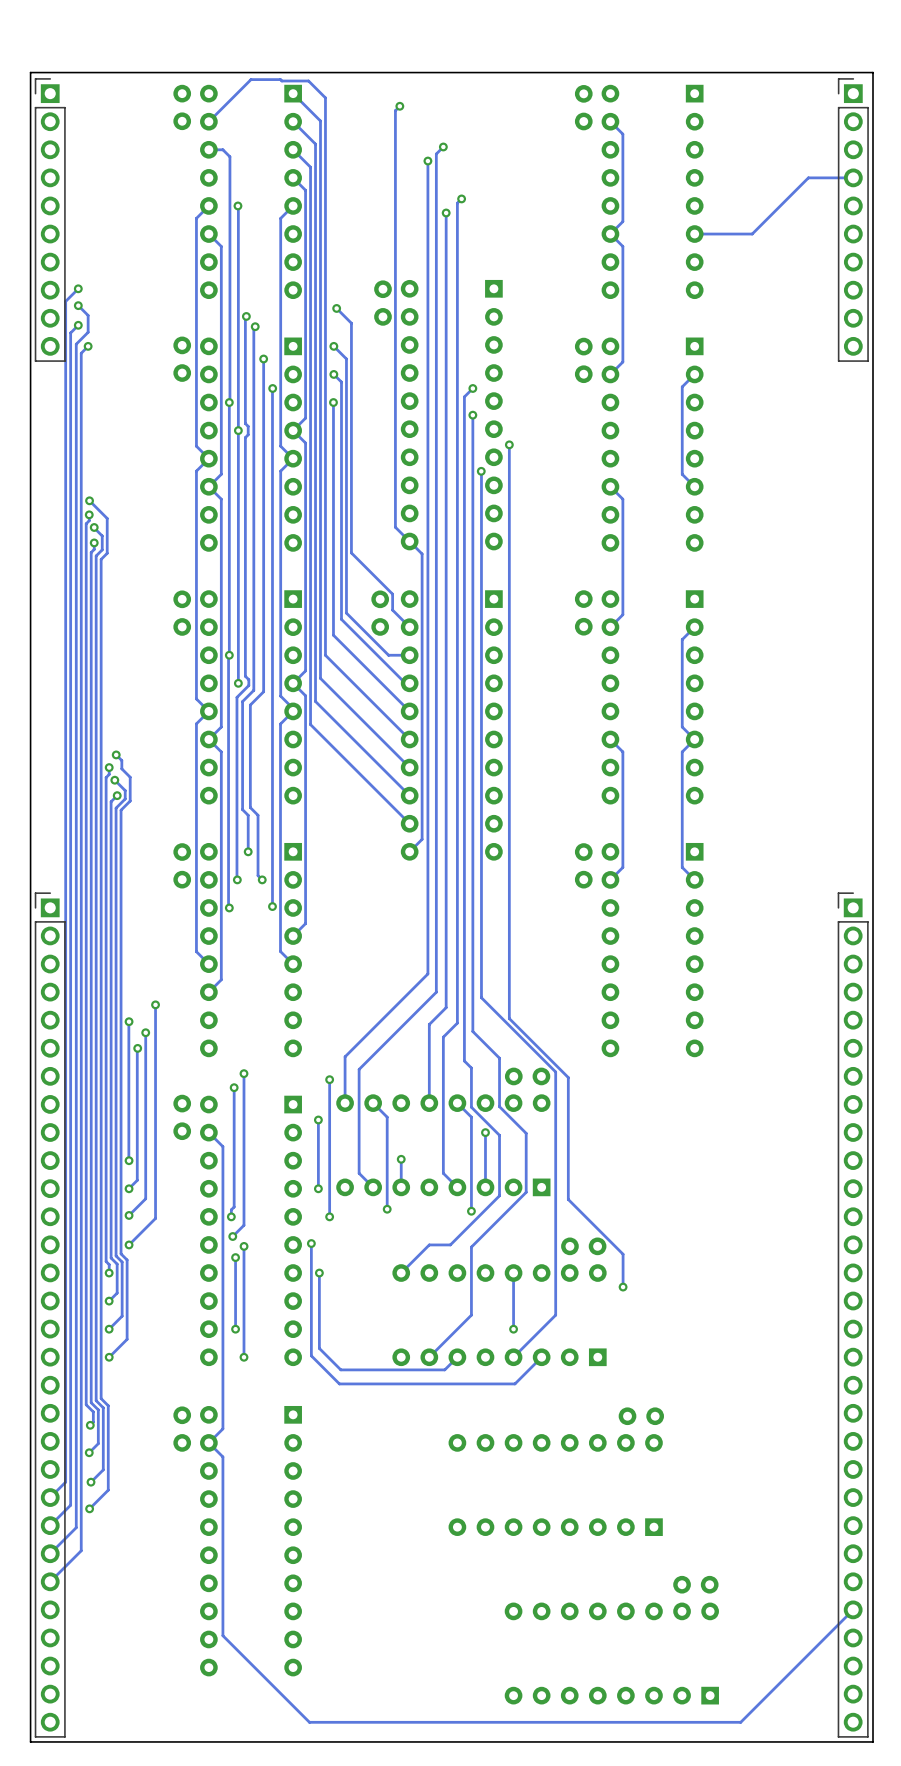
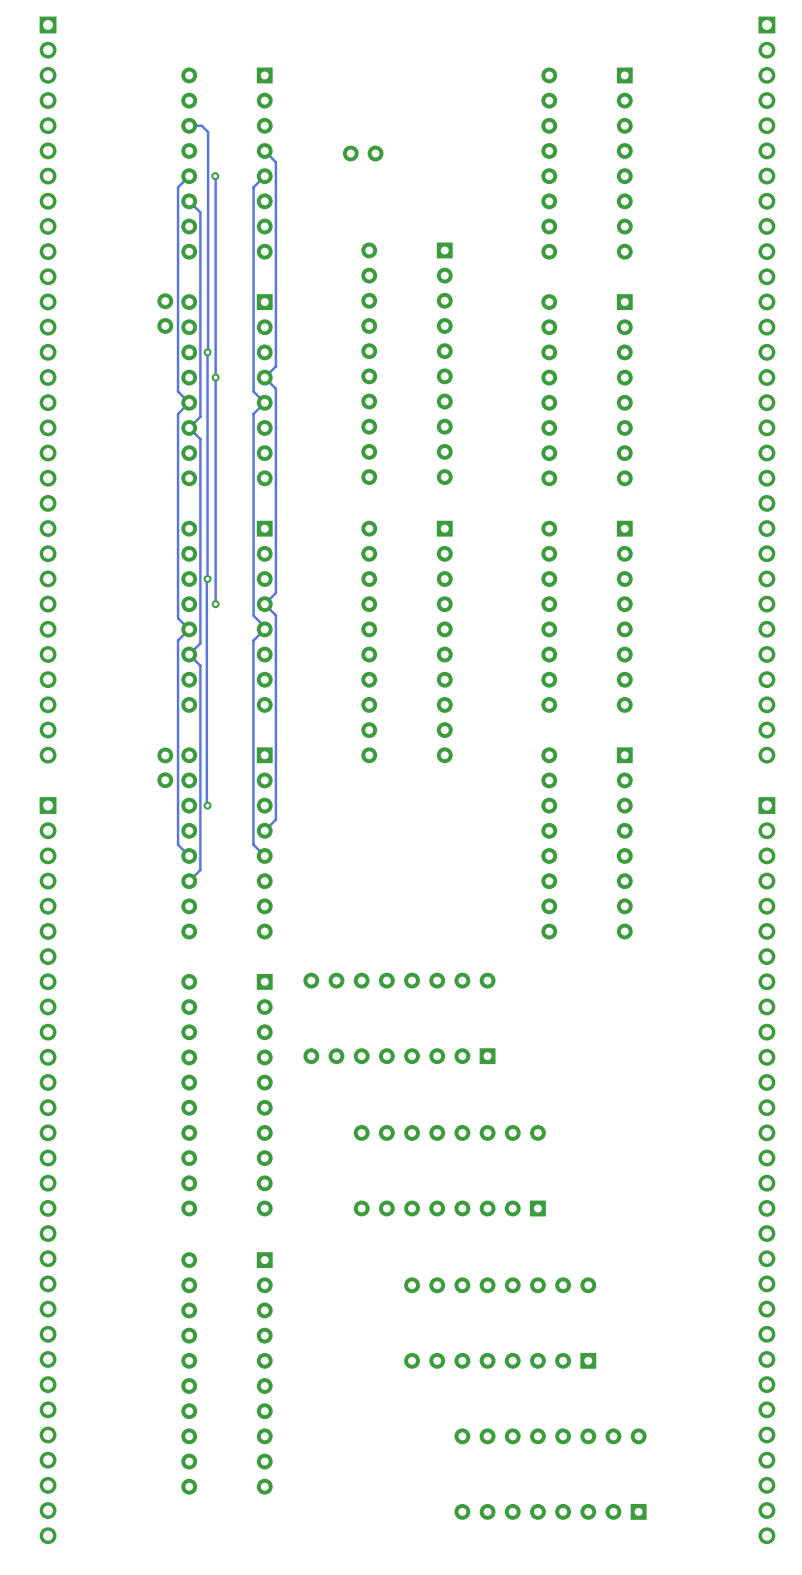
board edge: (873, 72) (30, 72) (30, 1741) (873, 1741) (873, 72) -> none
track: (293, 93) (320, 120) (320, 678) (409, 767) -> none
track: (399, 106) (395, 110) (395, 527) (422, 553) (422, 839) (409, 851) -> none
via: (399, 106) -> none
part: (182, 107) -> none
part: (583, 107) -> none
track: (208, 121) (251, 79) (308, 80) (325, 97) (325, 655) (409, 739) -> none
track: (293, 121) (315, 144) (315, 701) (409, 795) -> none
track: (610, 121) (622, 134) (622, 221) (610, 234) (622, 246) (622, 362) (610, 374) -> none
track: (443, 146) (436, 154) (436, 992) (359, 1069) (359, 1173) (373, 1187) -> none
via: (443, 146) -> none
track: (293, 149) (310, 167) (310, 724) (409, 823) -> none
track: (427, 161) (427, 973) (345, 1056) (345, 1103) -> none
via: (427, 161) -> none
track: (853, 177) (808, 177) (752, 234) (694, 234) -> none
part: none -> (363, 153)
track: (461, 198) (457, 203) (457, 1023) (443, 1037) (443, 1173) (457, 1187) -> none
via: (461, 198) -> none
track: (446, 212) (446, 1007) (429, 1024) (429, 1103) -> none
via: (446, 212) -> none
part: (50, 219) -> none
part: (853, 219) -> none
track: (78, 288) (65, 301) (65, 1482) (50, 1497) -> none
via: (78, 288) -> none
part: (382, 303) -> none
track: (78, 305) (88, 315) (88, 332) (76, 344) (76, 1527) (50, 1553) -> none
via: (78, 305) -> none
track: (336, 308) (351, 323) (351, 552) (392, 594) (392, 610) (409, 627) -> none
via: (336, 308) -> none
track: (246, 316) (245, 423) (248, 426) (248, 434) (245, 437) (245, 676) (248, 679) (248, 685) (236, 697) (237, 879) -> none
via: (246, 316) -> none
track: (78, 325) (70, 332) (70, 1505) (50, 1525) -> none
via: (78, 325) -> none
track: (255, 326) (253, 690) (242, 701) (242, 809) (248, 815) (248, 851) -> none
via: (255, 326) -> none
track: (88, 346) (81, 353) (81, 1550) (50, 1581) -> none
via: (88, 346) -> none
track: (333, 346) (346, 358) (346, 613) (388, 655) (409, 655) -> none
via: (333, 346) -> none
track: (263, 358) (263, 691) (250, 705) (250, 807) (258, 815) (258, 875) (262, 879) -> none
via: (263, 358) -> none
part: (583, 360) -> none
track: (333, 374) (341, 382) (341, 619) (405, 683) (409, 683) -> none
via: (333, 374) -> none
track: (694, 374) (682, 386) (682, 474) (694, 486) -> none
track: (272, 388) (272, 906) -> none
via: (272, 388) -> none
track: (472, 388) (464, 396) (464, 1061) (471, 1068) (471, 1107) (499, 1135) (499, 1195) (450, 1244) (429, 1244) (401, 1273) -> none
via: (472, 388) -> none
track: (333, 402) (333, 635) (409, 711) -> none
via: (333, 402) -> none
track: (472, 415) (472, 1031) (499, 1058) (499, 1106) (526, 1133) (526, 1192) (471, 1247) (471, 1315) (429, 1357) -> none
via: (472, 415) -> none
part: none -> (48, 390)
track: (509, 444) (509, 1018) (568, 1077) (568, 1199) (623, 1254) (623, 1287) -> none
via: (509, 444) -> none
part: none -> (766, 390)
track: (481, 471) (481, 997) (555, 1071) (555, 1315) (513, 1357) -> none
via: (481, 471) -> none
track: (610, 486) (622, 499) (622, 614) (610, 627) -> none
track: (89, 500) (107, 518) (107, 553) (101, 559) (101, 1398) (108, 1405) (108, 1490) (89, 1508) -> none
via: (89, 500) -> none
track: (89, 514) (89, 520) (86, 523) (86, 1404) (93, 1411) (93, 1422) (90, 1425) -> none
via: (89, 514) -> none
track: (94, 527) (102, 535) (102, 549) (96, 555) (96, 1400) (103, 1407) (103, 1469) (91, 1482) -> none
via: (94, 527) -> none
track: (94, 542) (94, 549) (91, 552) (91, 1402) (98, 1409) (98, 1443) (89, 1452) -> none
via: (94, 542) -> none
part: (583, 612) -> none
part: (182, 613) -> none
part: (380, 613) -> none
track: (694, 627) (682, 639) (682, 727) (694, 739) (682, 751) (682, 867) (694, 879) -> none
track: (610, 739) (622, 751) (622, 867) (610, 879) -> none
track: (116, 754) (121, 760) (121, 768) (130, 777) (130, 801) (121, 810) (121, 1253) (127, 1259) (127, 1339) (109, 1357) -> none
via: (116, 754) -> none
track: (109, 767) (109, 774) (106, 777) (106, 1261) (109, 1264) (109, 1272) -> none
via: (109, 767) -> none
track: (114, 780) (125, 790) (125, 798) (116, 808) (116, 1255) (122, 1262) (122, 1316) (109, 1329) -> none
via: (114, 780) -> none
track: (117, 795) (111, 801) (111, 1258) (117, 1264) (117, 1293) (109, 1301) -> none
via: (117, 795) -> none
via: (248, 851) -> none
part: (583, 865) -> none
via: (237, 879) -> none
via: (262, 879) -> none
via: (272, 906) -> none
track: (155, 1004) (155, 1218) (129, 1244) -> none
via: (155, 1004) -> none
track: (129, 1021) (129, 1160) -> none
via: (129, 1021) -> none
track: (145, 1032) (145, 1198) (129, 1215) -> none
via: (145, 1032) -> none
track: (137, 1048) (137, 1180) (129, 1188) -> none
via: (137, 1048) -> none
track: (243, 1073) (243, 1225) (232, 1236) -> none
via: (243, 1073) -> none
part: (527, 1076) -> none
track: (329, 1079) (329, 1216) -> none
via: (329, 1079) -> none
track: (234, 1087) (234, 1207) (231, 1209) (231, 1216) -> none
via: (234, 1087) -> none
track: (373, 1103) (387, 1117) (387, 1209) -> none
track: (457, 1103) (471, 1117) (471, 1211) -> none
part: (182, 1117) -> none
track: (318, 1119) (318, 1188) -> none
via: (318, 1119) -> none
track: (208, 1132) (222, 1146) (222, 1428) (208, 1442) (222, 1456) (222, 1635) (309, 1722) (740, 1722) (853, 1609) -> none
track: (485, 1132) (485, 1187) -> none
via: (485, 1132) -> none
track: (401, 1159) (401, 1187) -> none
via: (401, 1159) -> none
via: (129, 1160) -> none
via: (129, 1188) -> none
via: (318, 1188) -> none
via: (387, 1209) -> none
via: (471, 1211) -> none
via: (129, 1215) -> none
via: (231, 1216) -> none
via: (329, 1216) -> none
via: (232, 1236) -> none
track: (311, 1243) (311, 1355) (339, 1383) (514, 1383) (541, 1357) -> none
via: (311, 1243) -> none
via: (129, 1244) -> none
track: (243, 1246) (243, 1357) -> none
via: (244, 1246) -> none
part: (583, 1246) -> none
track: (235, 1257) (235, 1329) -> none
via: (235, 1257) -> none
via: (109, 1273) -> none
track: (319, 1273) (319, 1348) (340, 1369) (444, 1369) (457, 1357) -> none
via: (319, 1273) -> none
track: (513, 1273) (513, 1329) -> none
via: (623, 1287) -> none
via: (109, 1301) -> none
part side: bottom (50, 1315) -> top (48, 1170)
part side: bottom (853, 1315) -> top (766, 1170)
via: (109, 1329) -> none
via: (235, 1329) -> none
via: (513, 1329) -> none
via: (109, 1357) -> none
via: (243, 1357) -> none
part: (641, 1416) -> none
via: (90, 1425) -> none
part: (182, 1429) -> none
via: (89, 1452) -> none
via: (91, 1482) -> none
via: (89, 1508) -> none
part: (695, 1584) -> none

